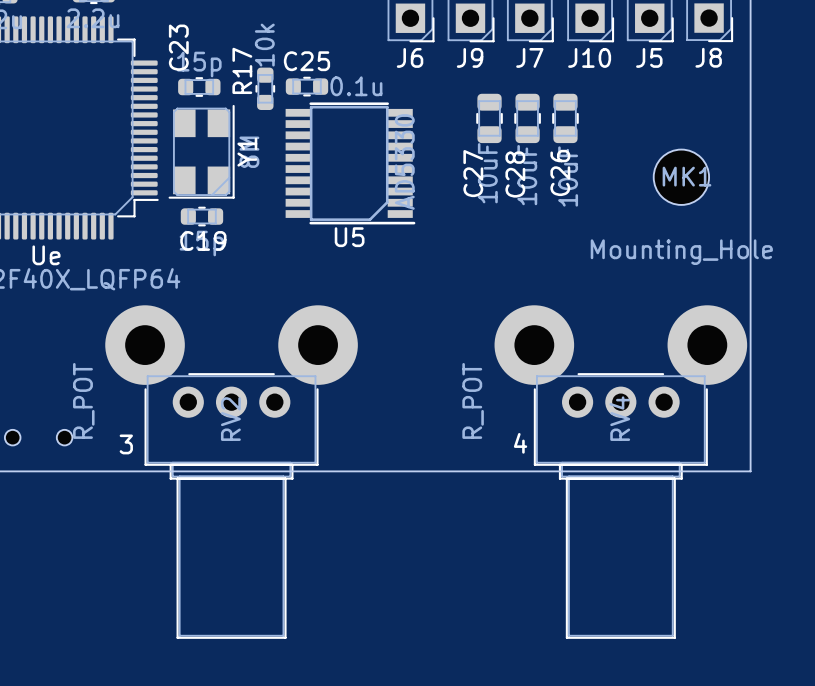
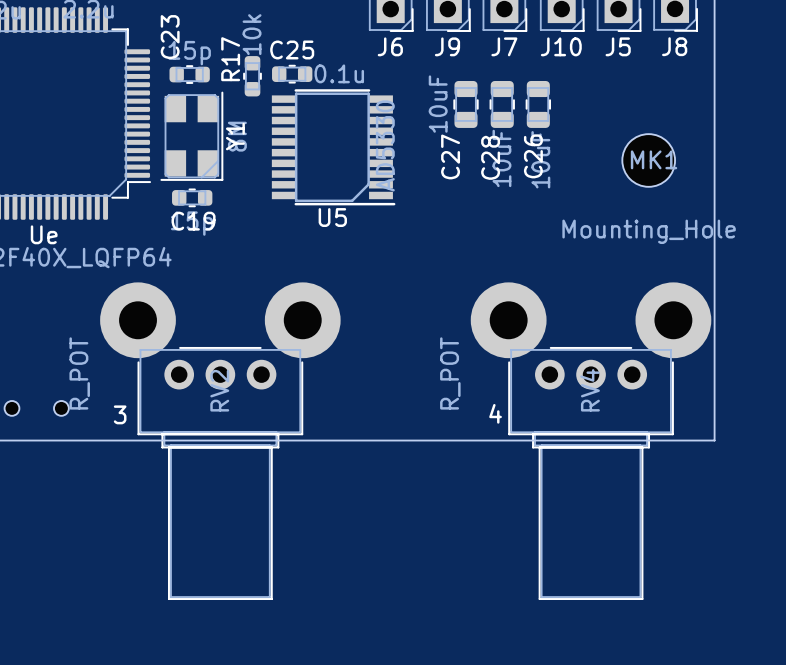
C27 value position: 10uF (487, 173) -> 10uF (438, 104)

